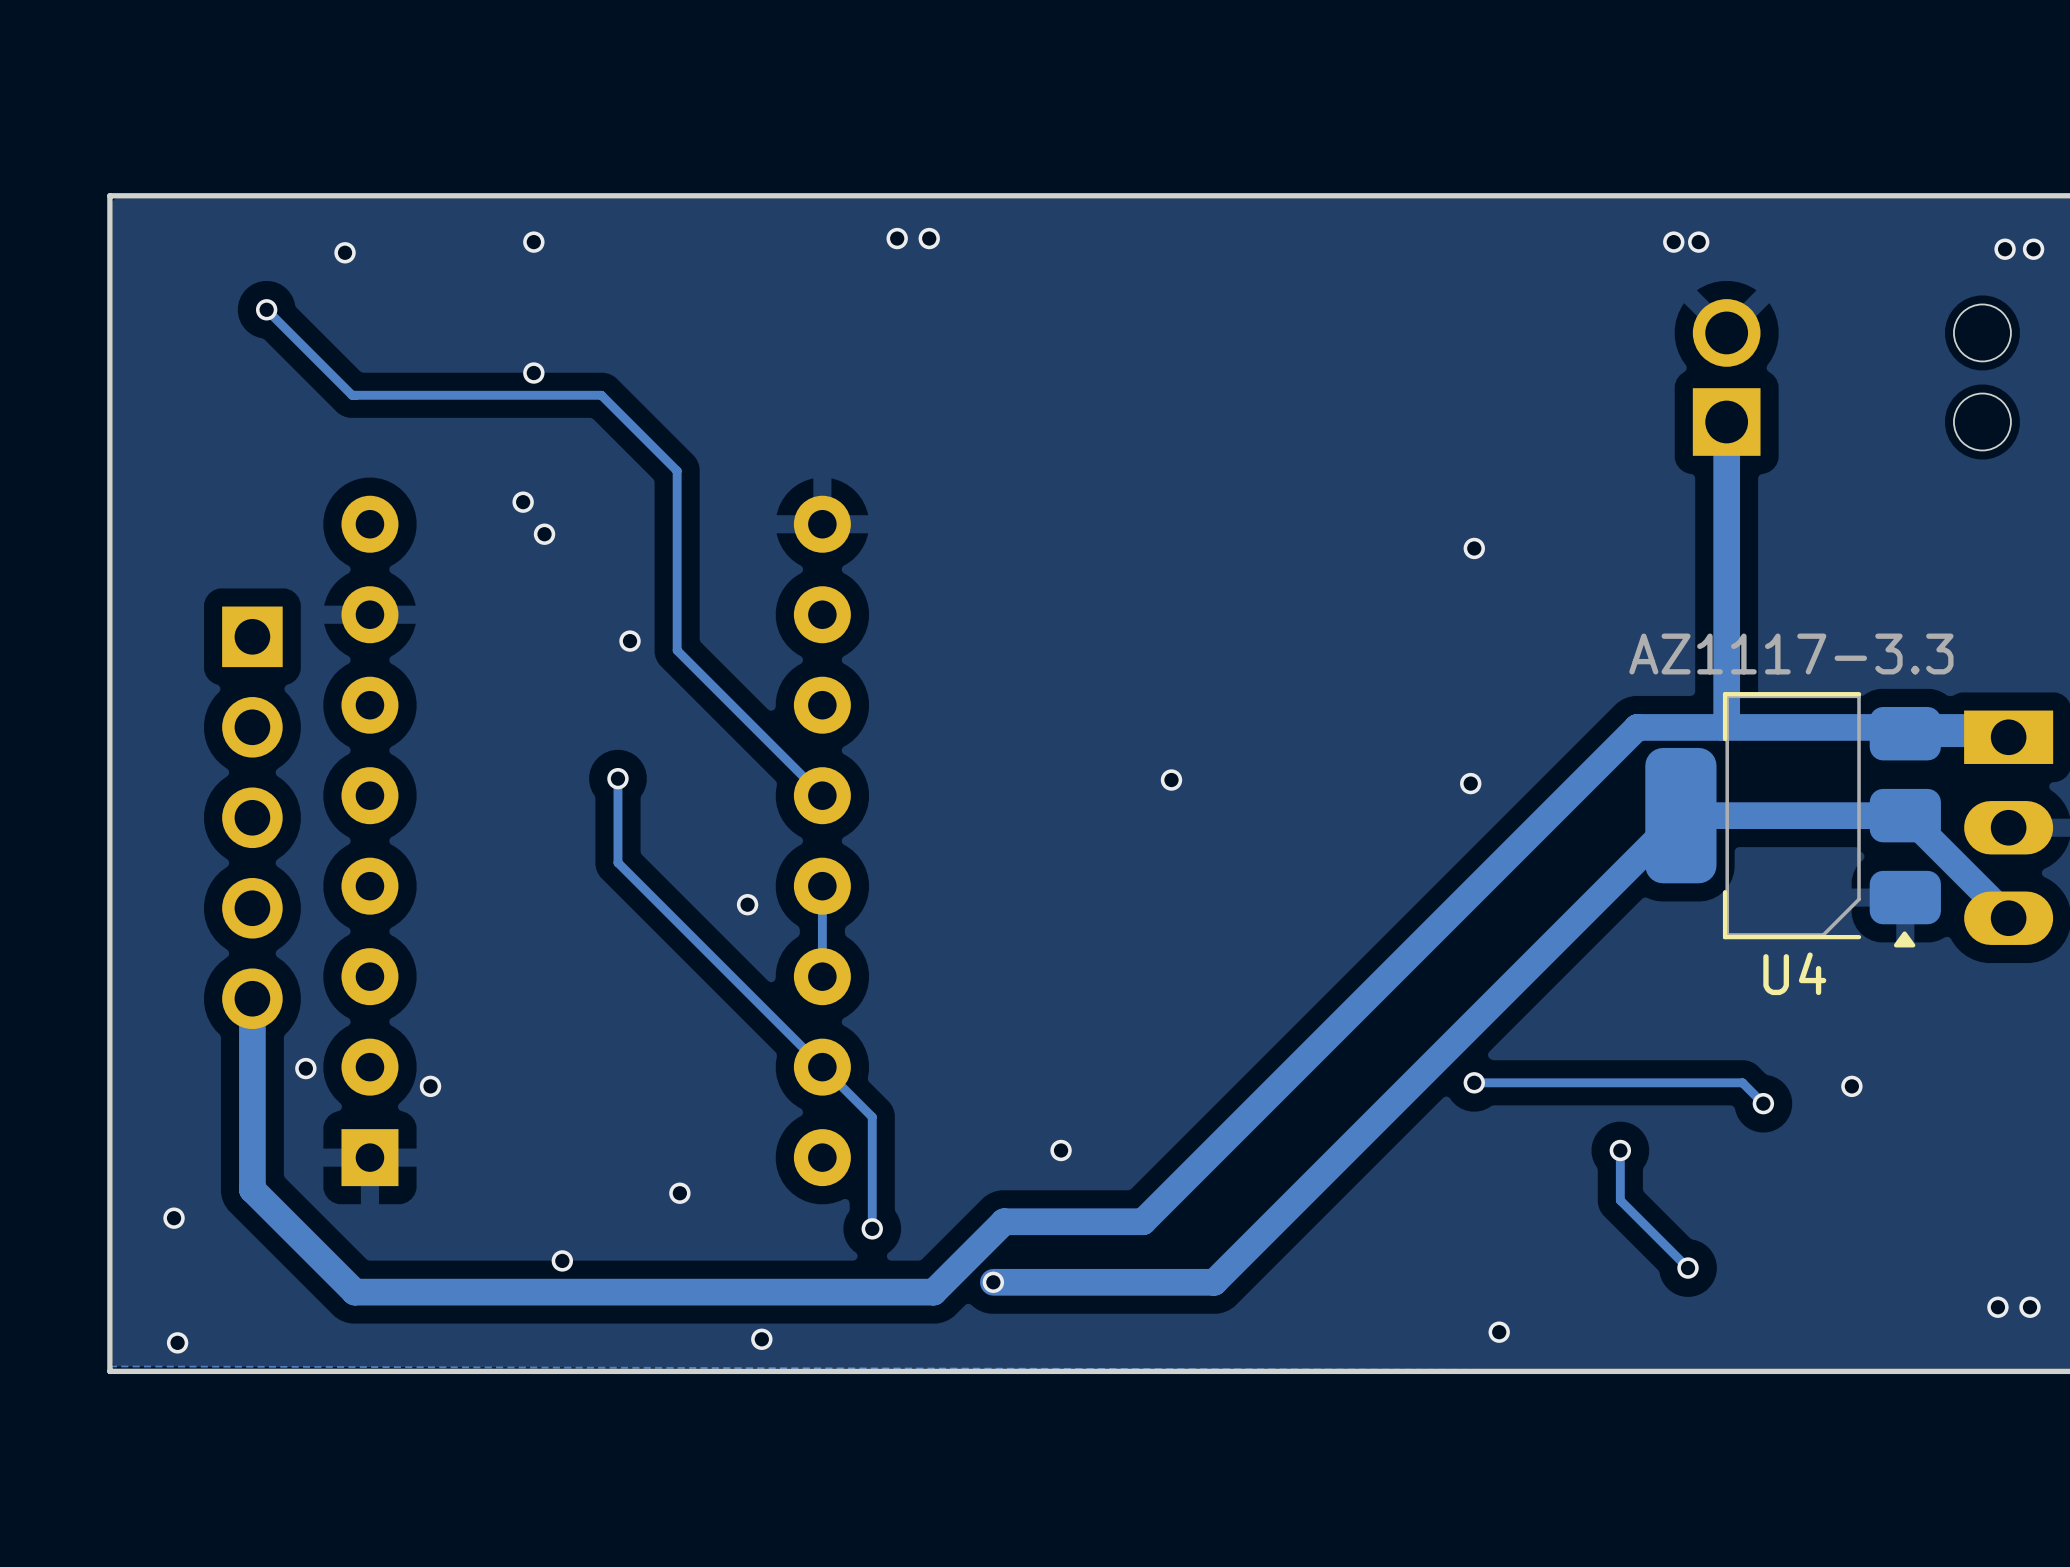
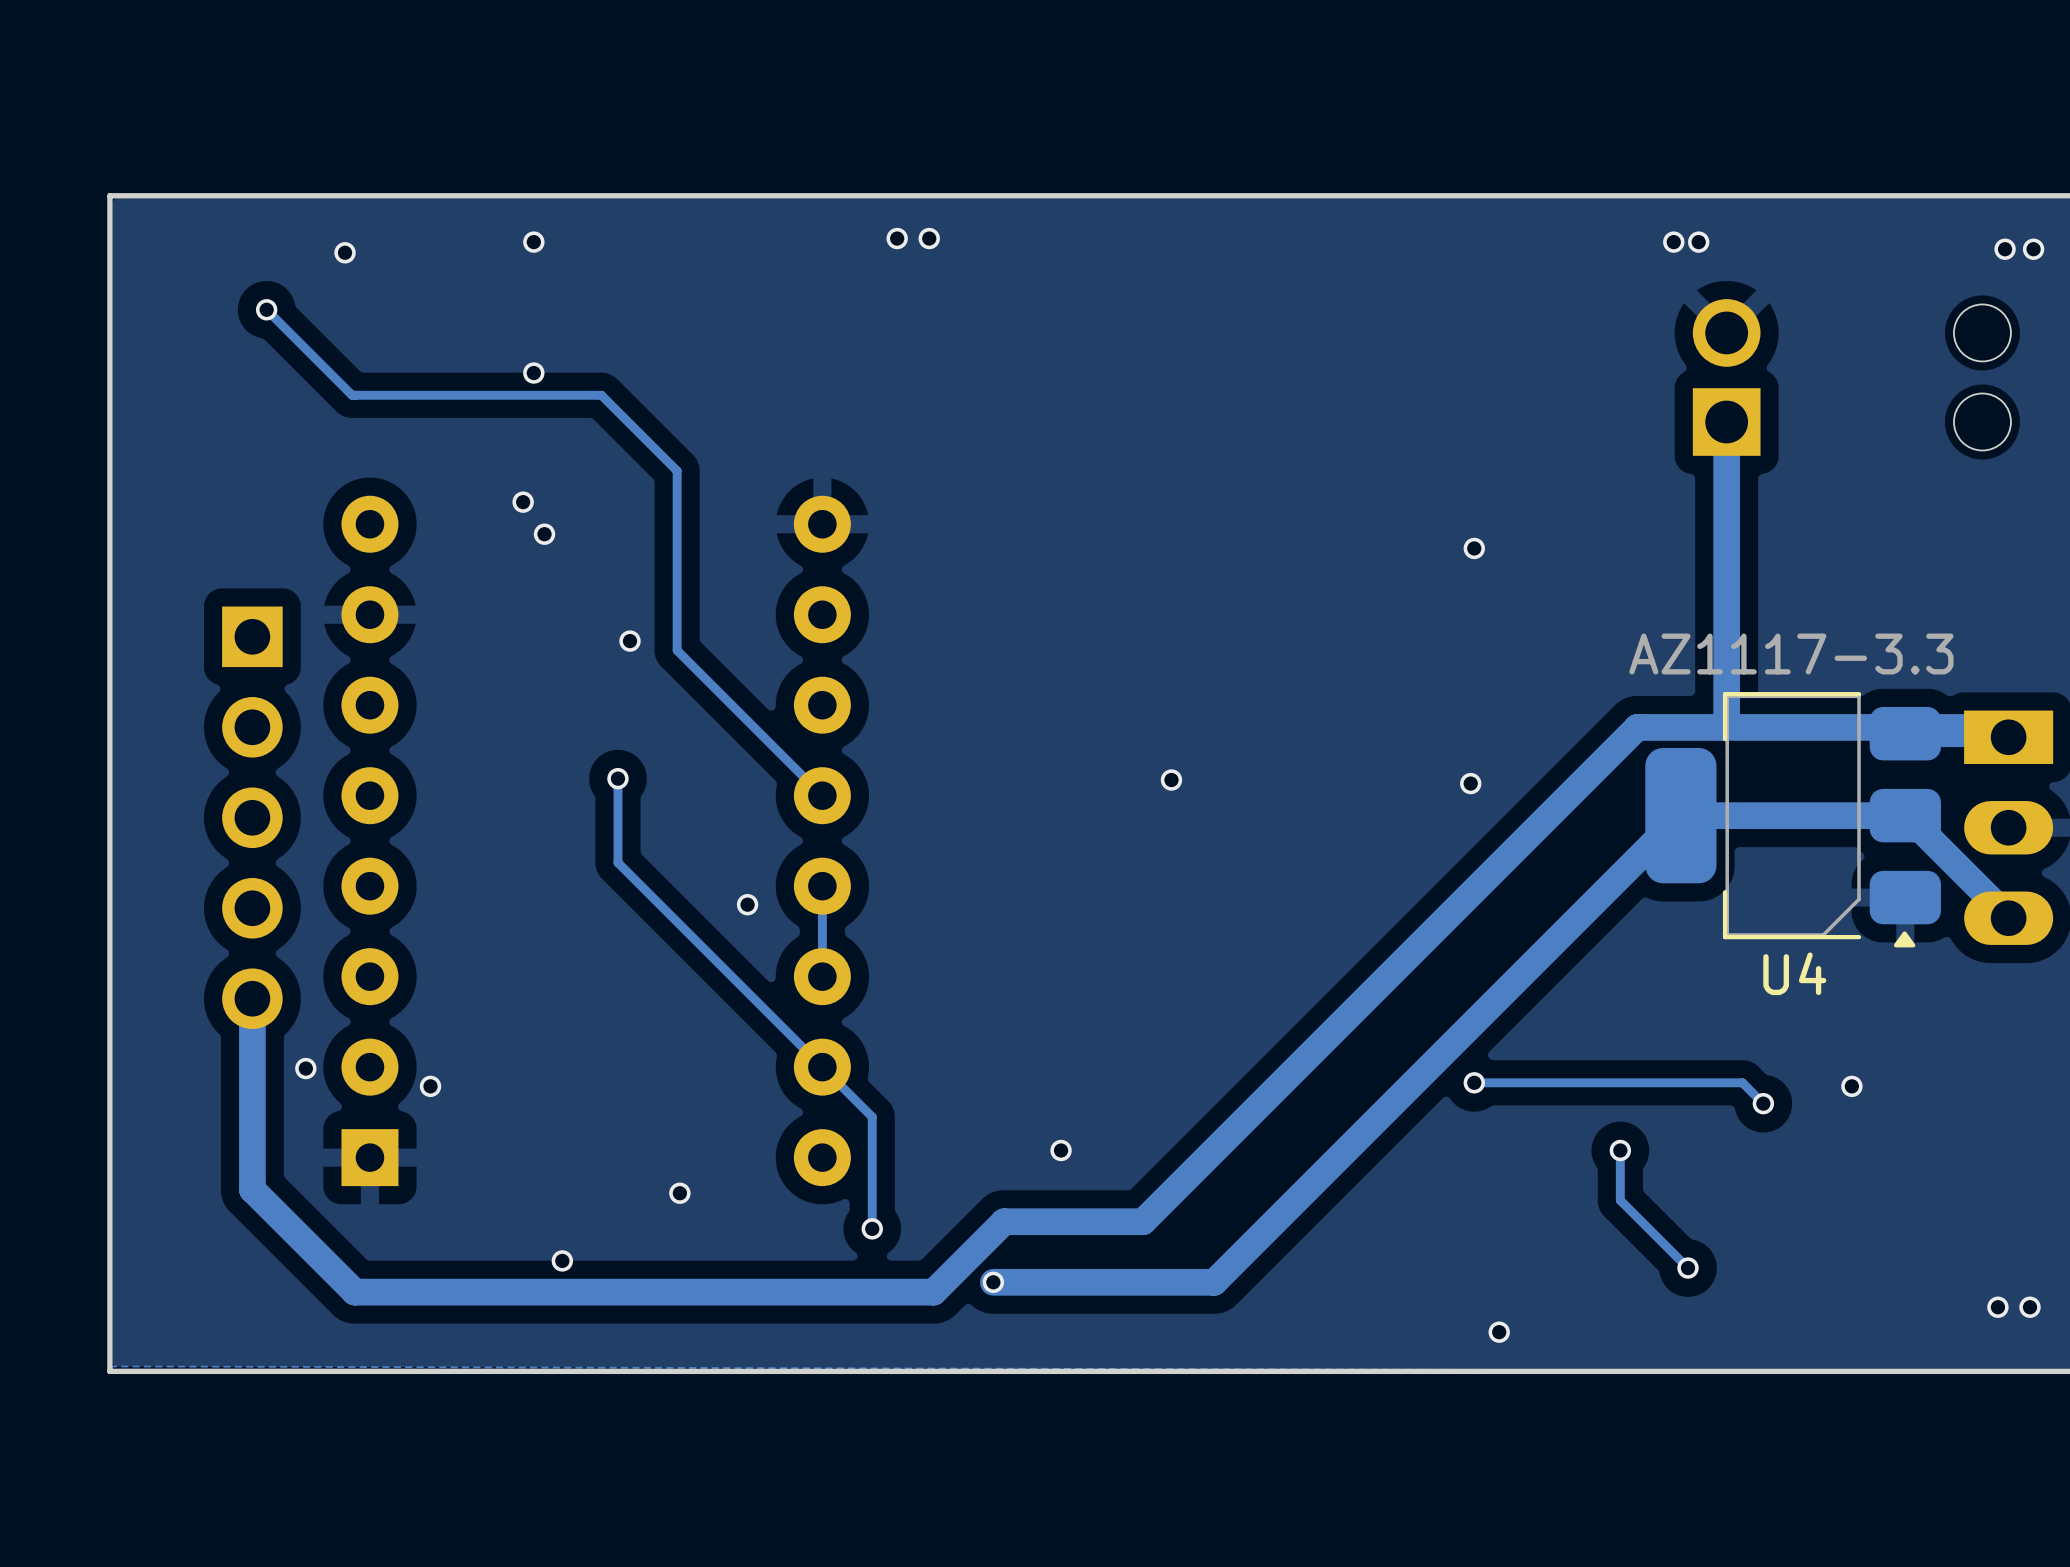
via: (174, 1218) -> none
via: (761, 1339) -> none
via: (177, 1342) -> none

